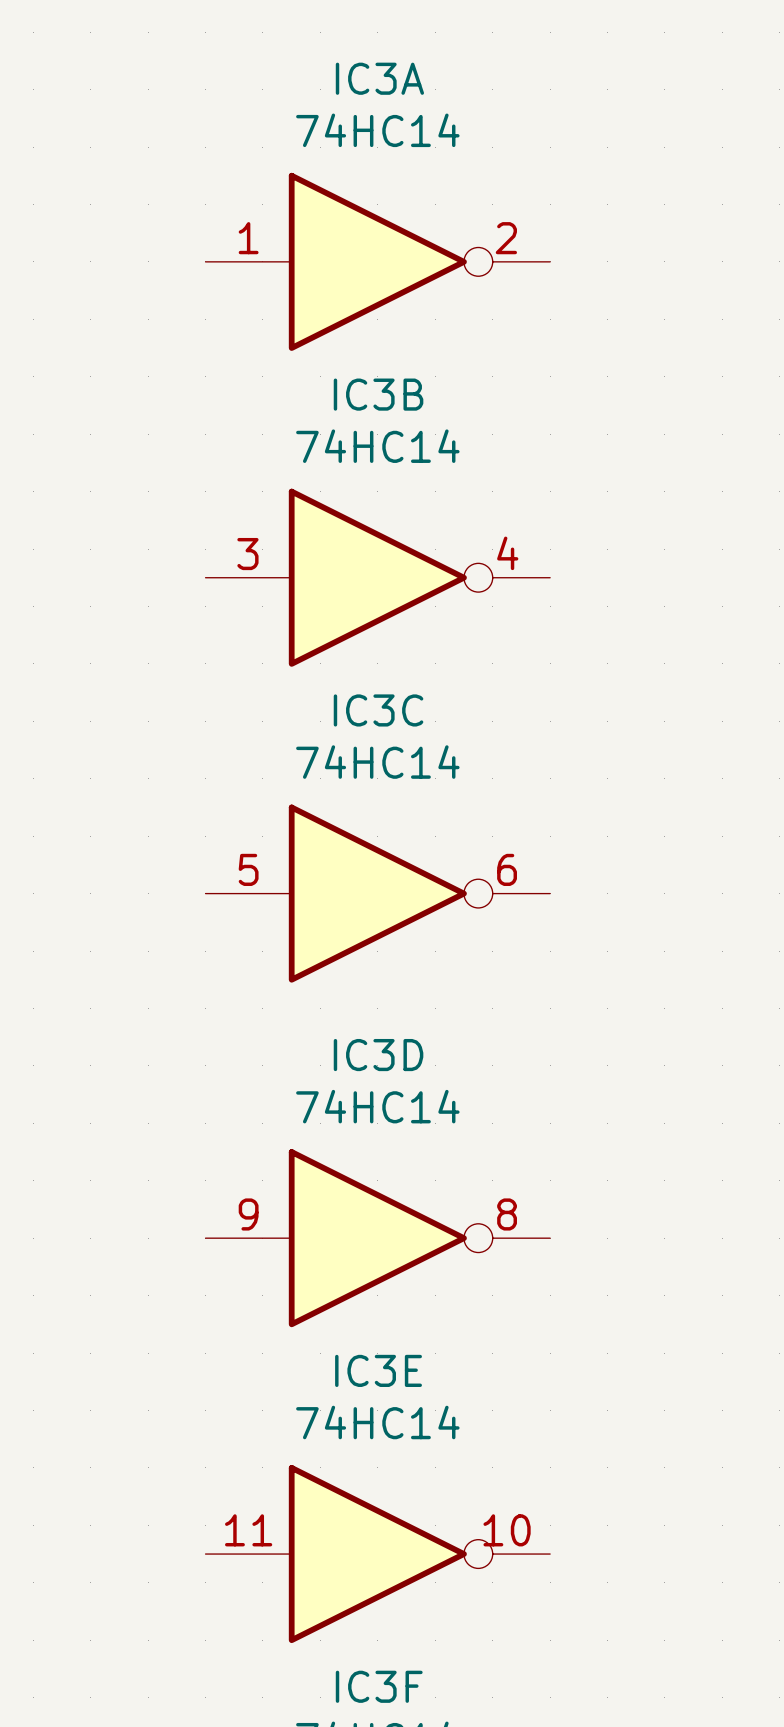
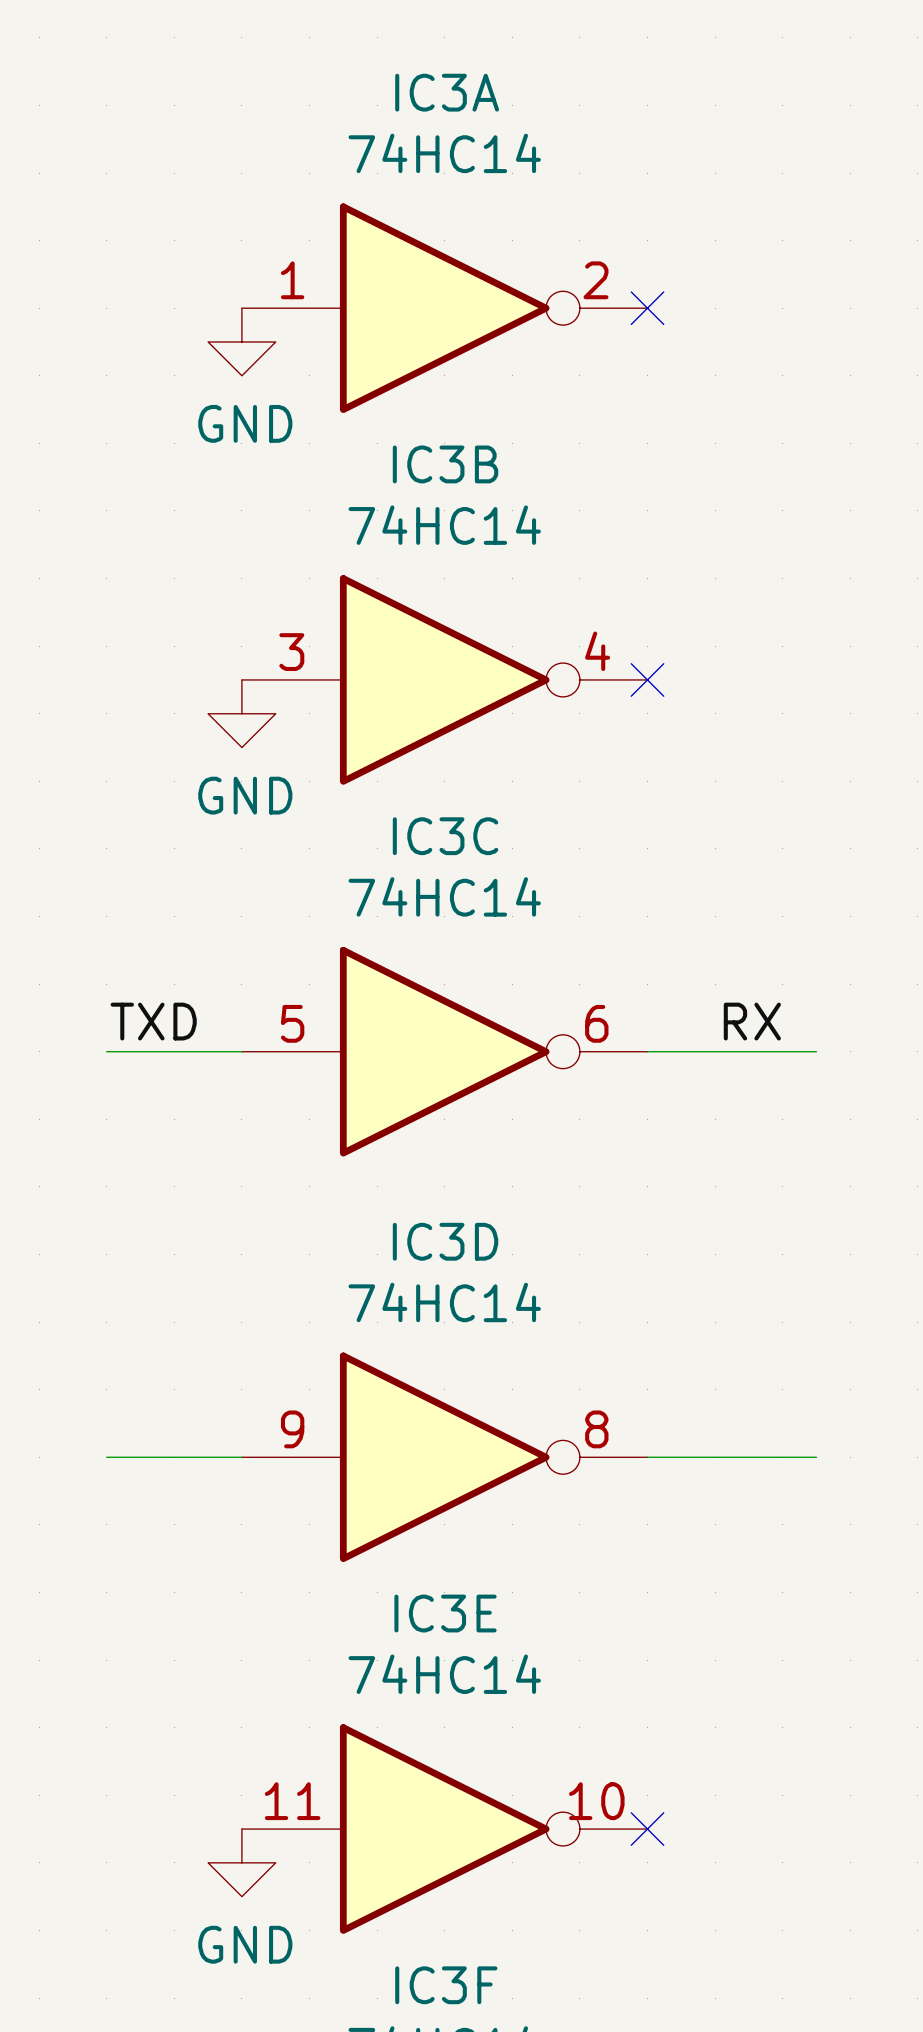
no-connect mark: none -> (647, 308)
power symbol: none -> GND (241, 342)
no-connect mark: none -> (647, 679)
power symbol: none -> GND (241, 713)
label: none -> TXD (153, 1021)
label: none -> RX (752, 1021)
wire: none -> (106, 1051) (241, 1051)
wire: none -> (647, 1051) (816, 1051)
wire: none -> (106, 1457) (241, 1457)
wire: none -> (647, 1457) (816, 1457)
no-connect mark: none -> (647, 1829)
power symbol: none -> GND (241, 1862)

